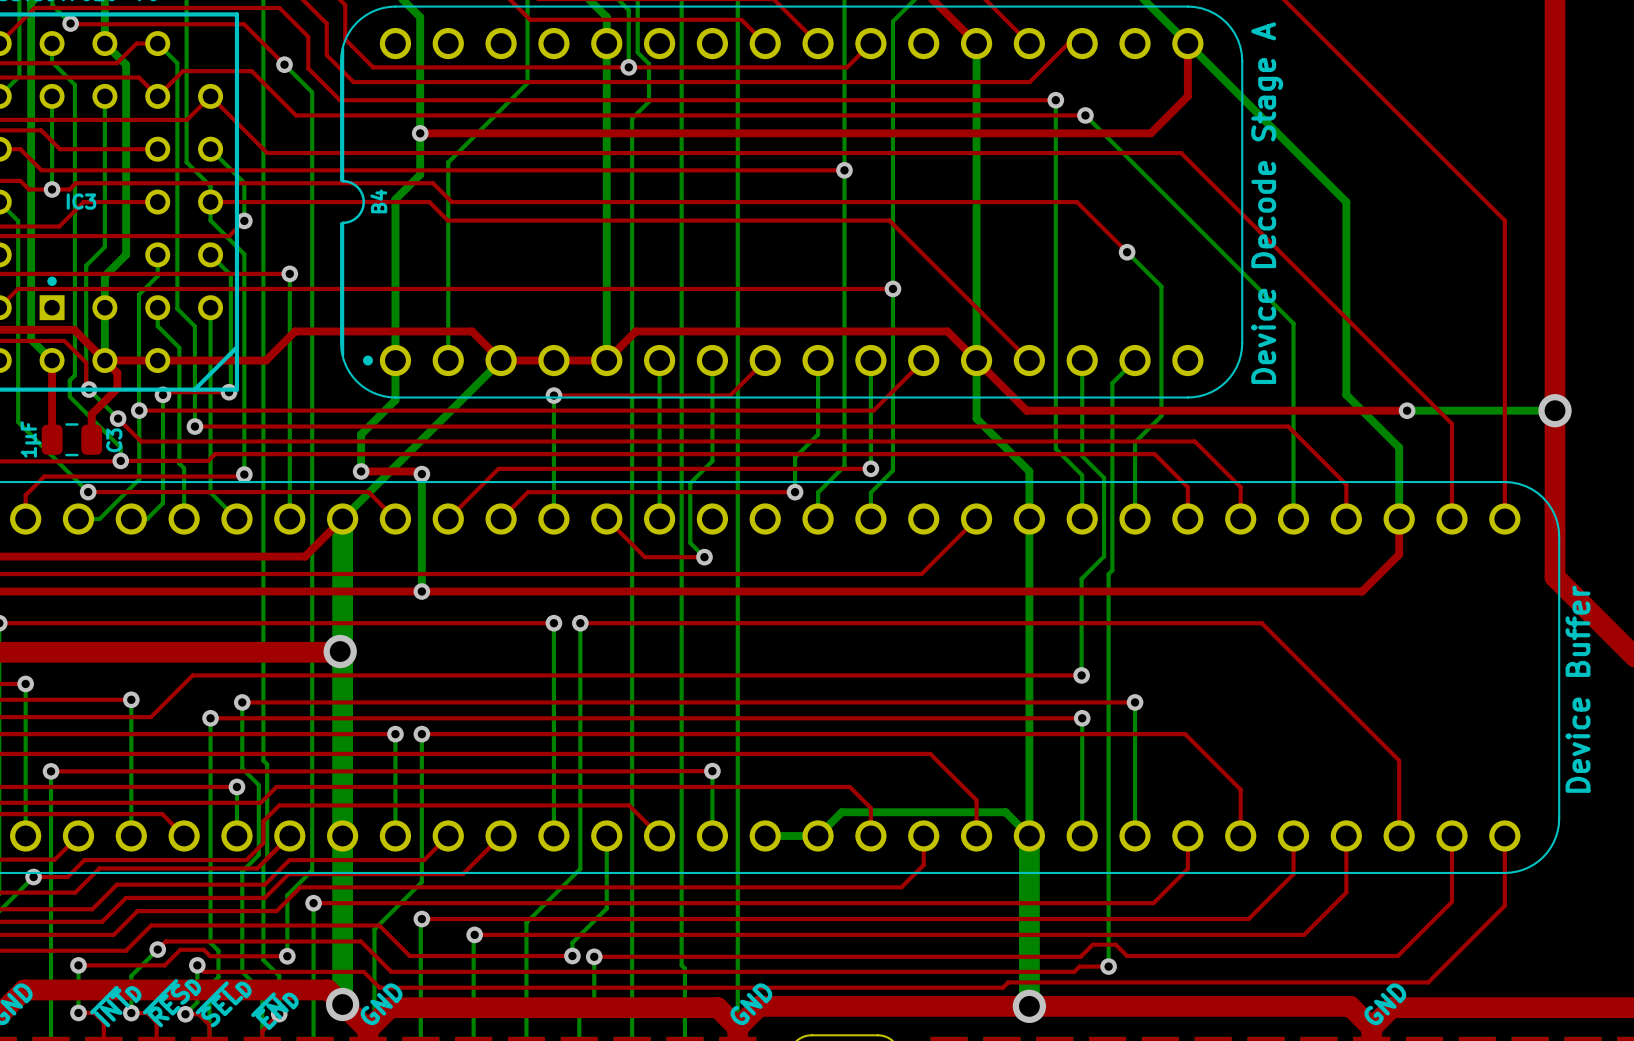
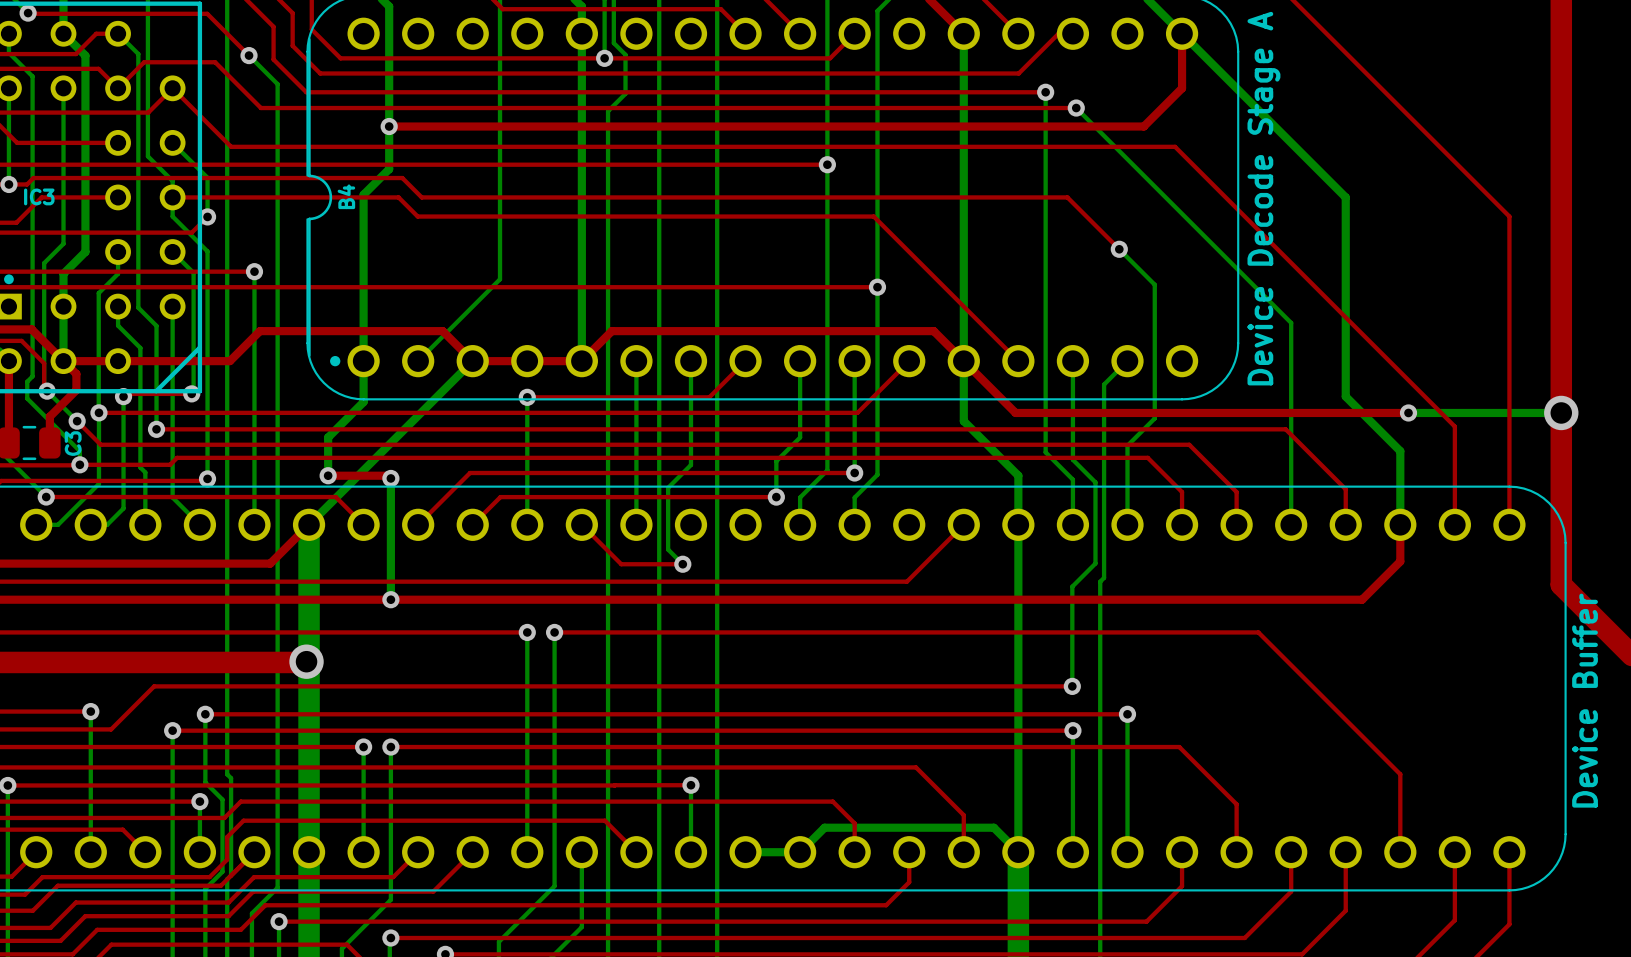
bottom track: (527, 83) (448, 162) (448, 360) -> (500, 74) (500, 279) (418, 361)

